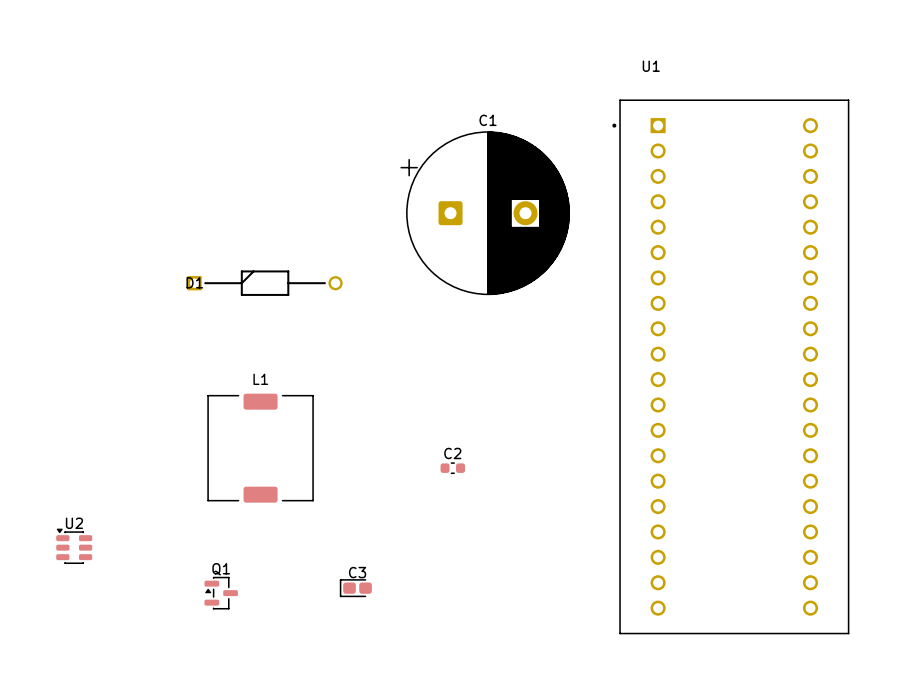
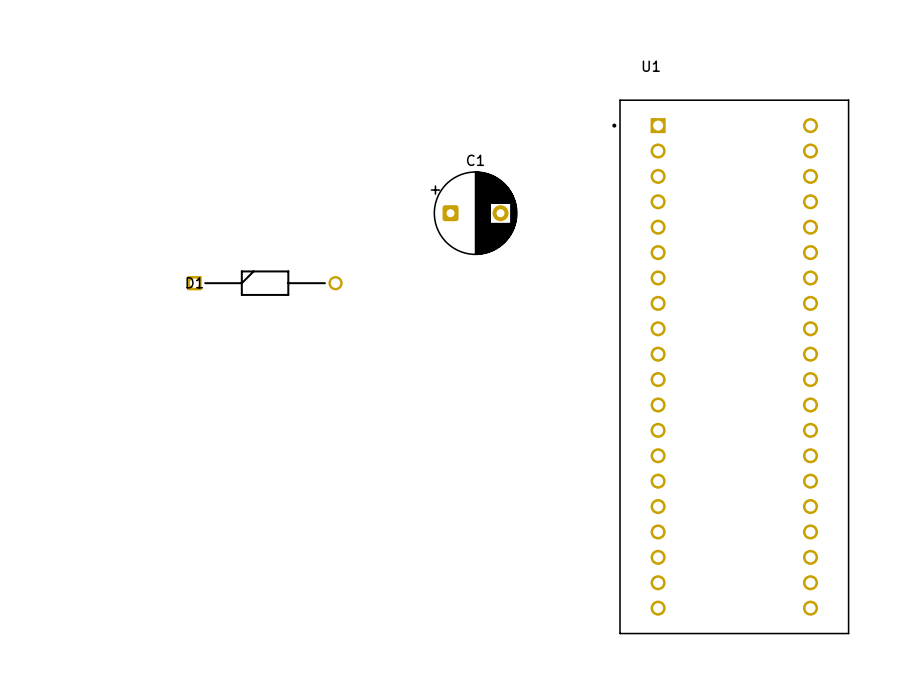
C1 name position: C1 (488, 120) -> C1 (475, 160)
C1 footprint: [400, 131, 570, 295] -> [430, 171, 518, 255]
L1: (260, 448) -> none
C2: (452, 468) -> none
U2: (74, 546) -> none
C3: (355, 588) -> none
Q1: (221, 593) -> none

